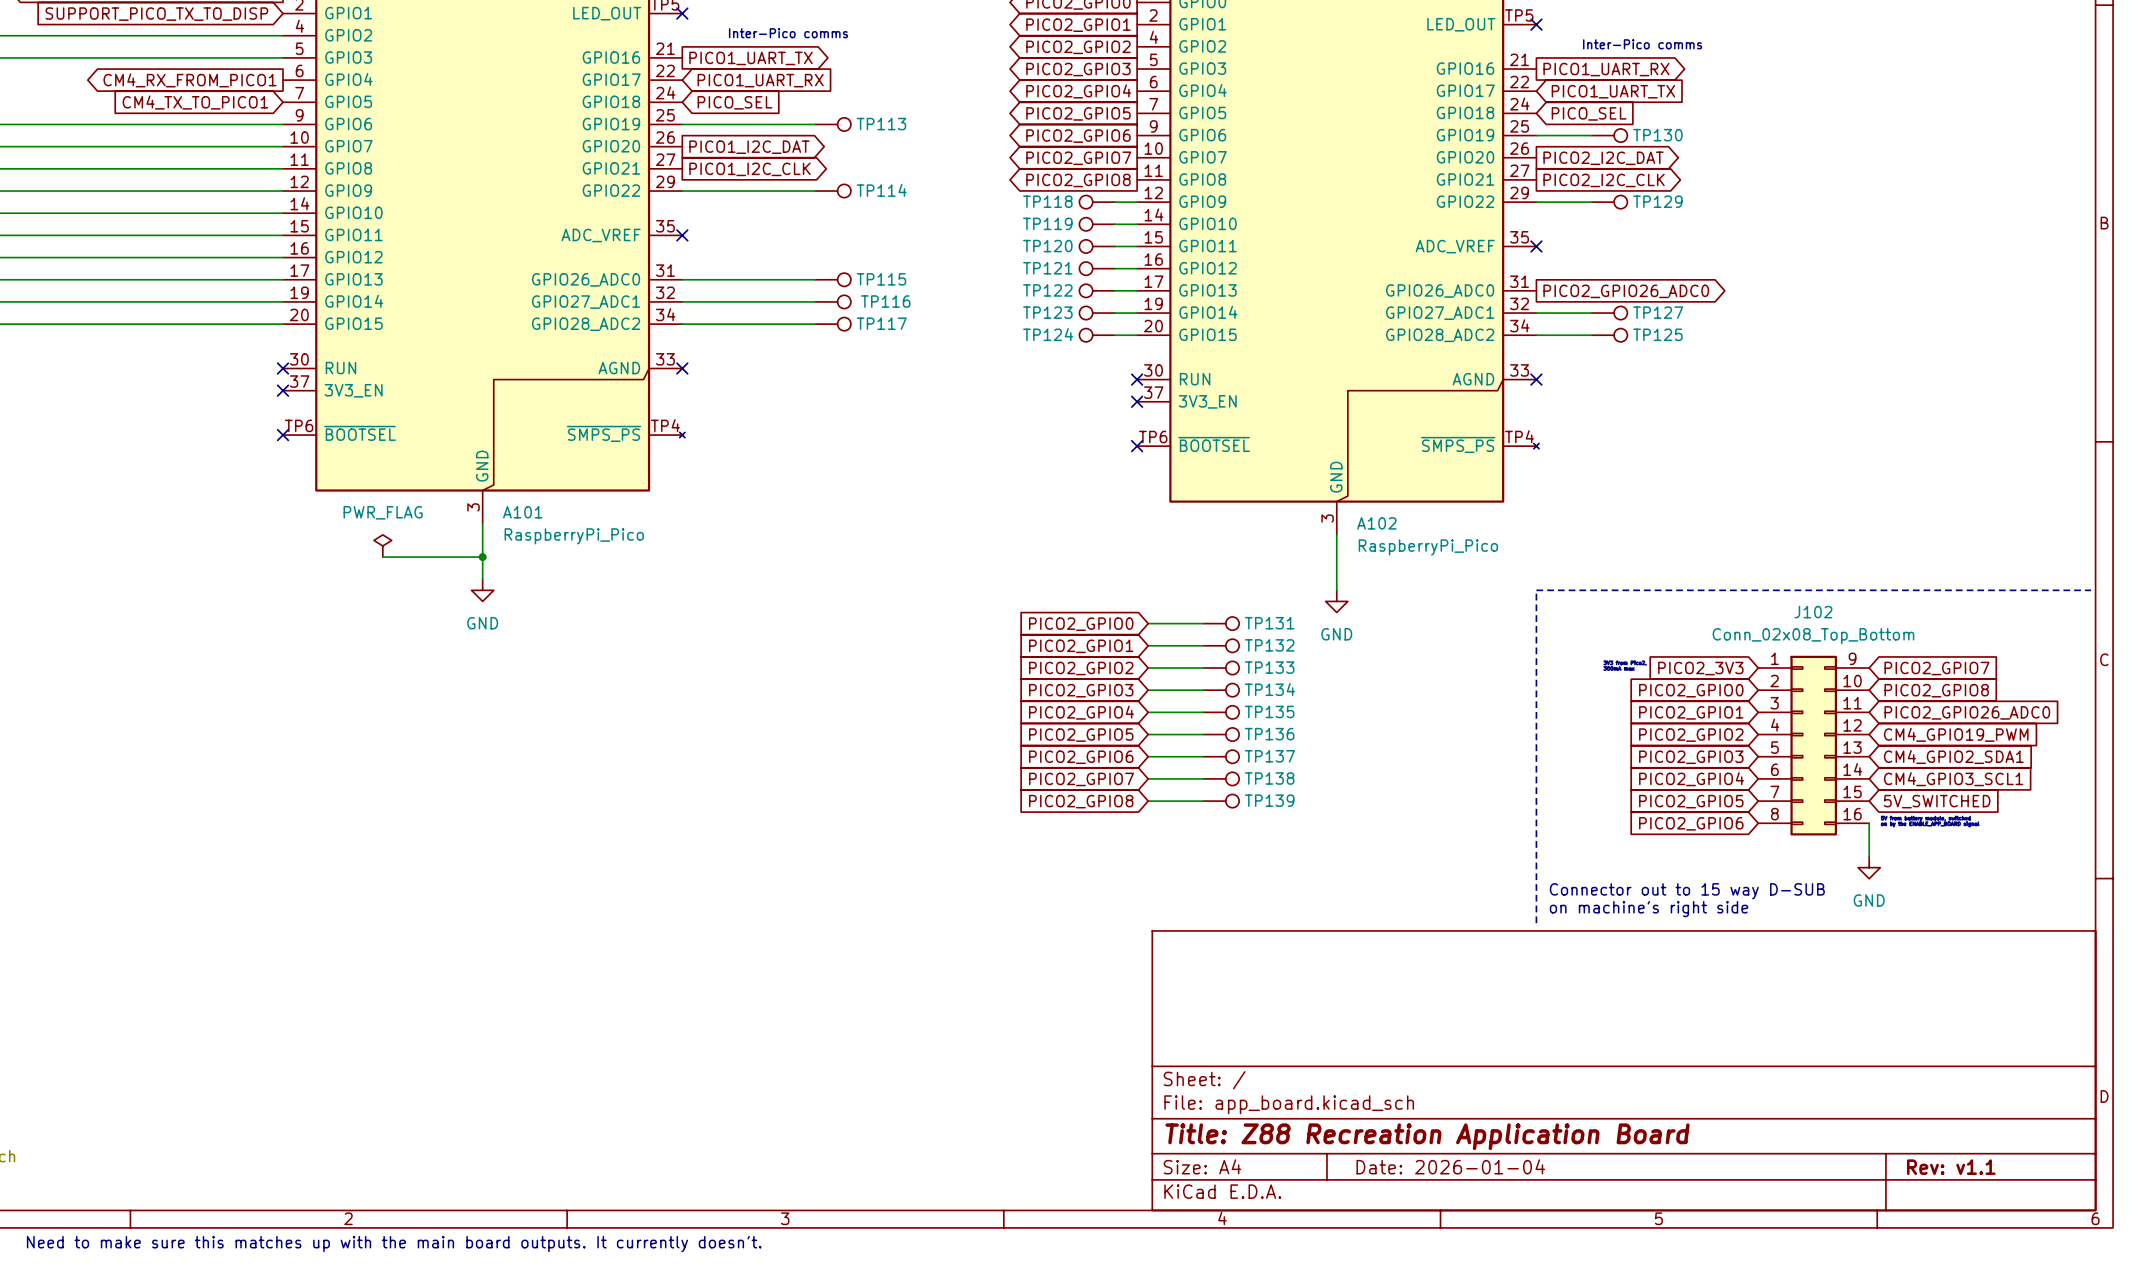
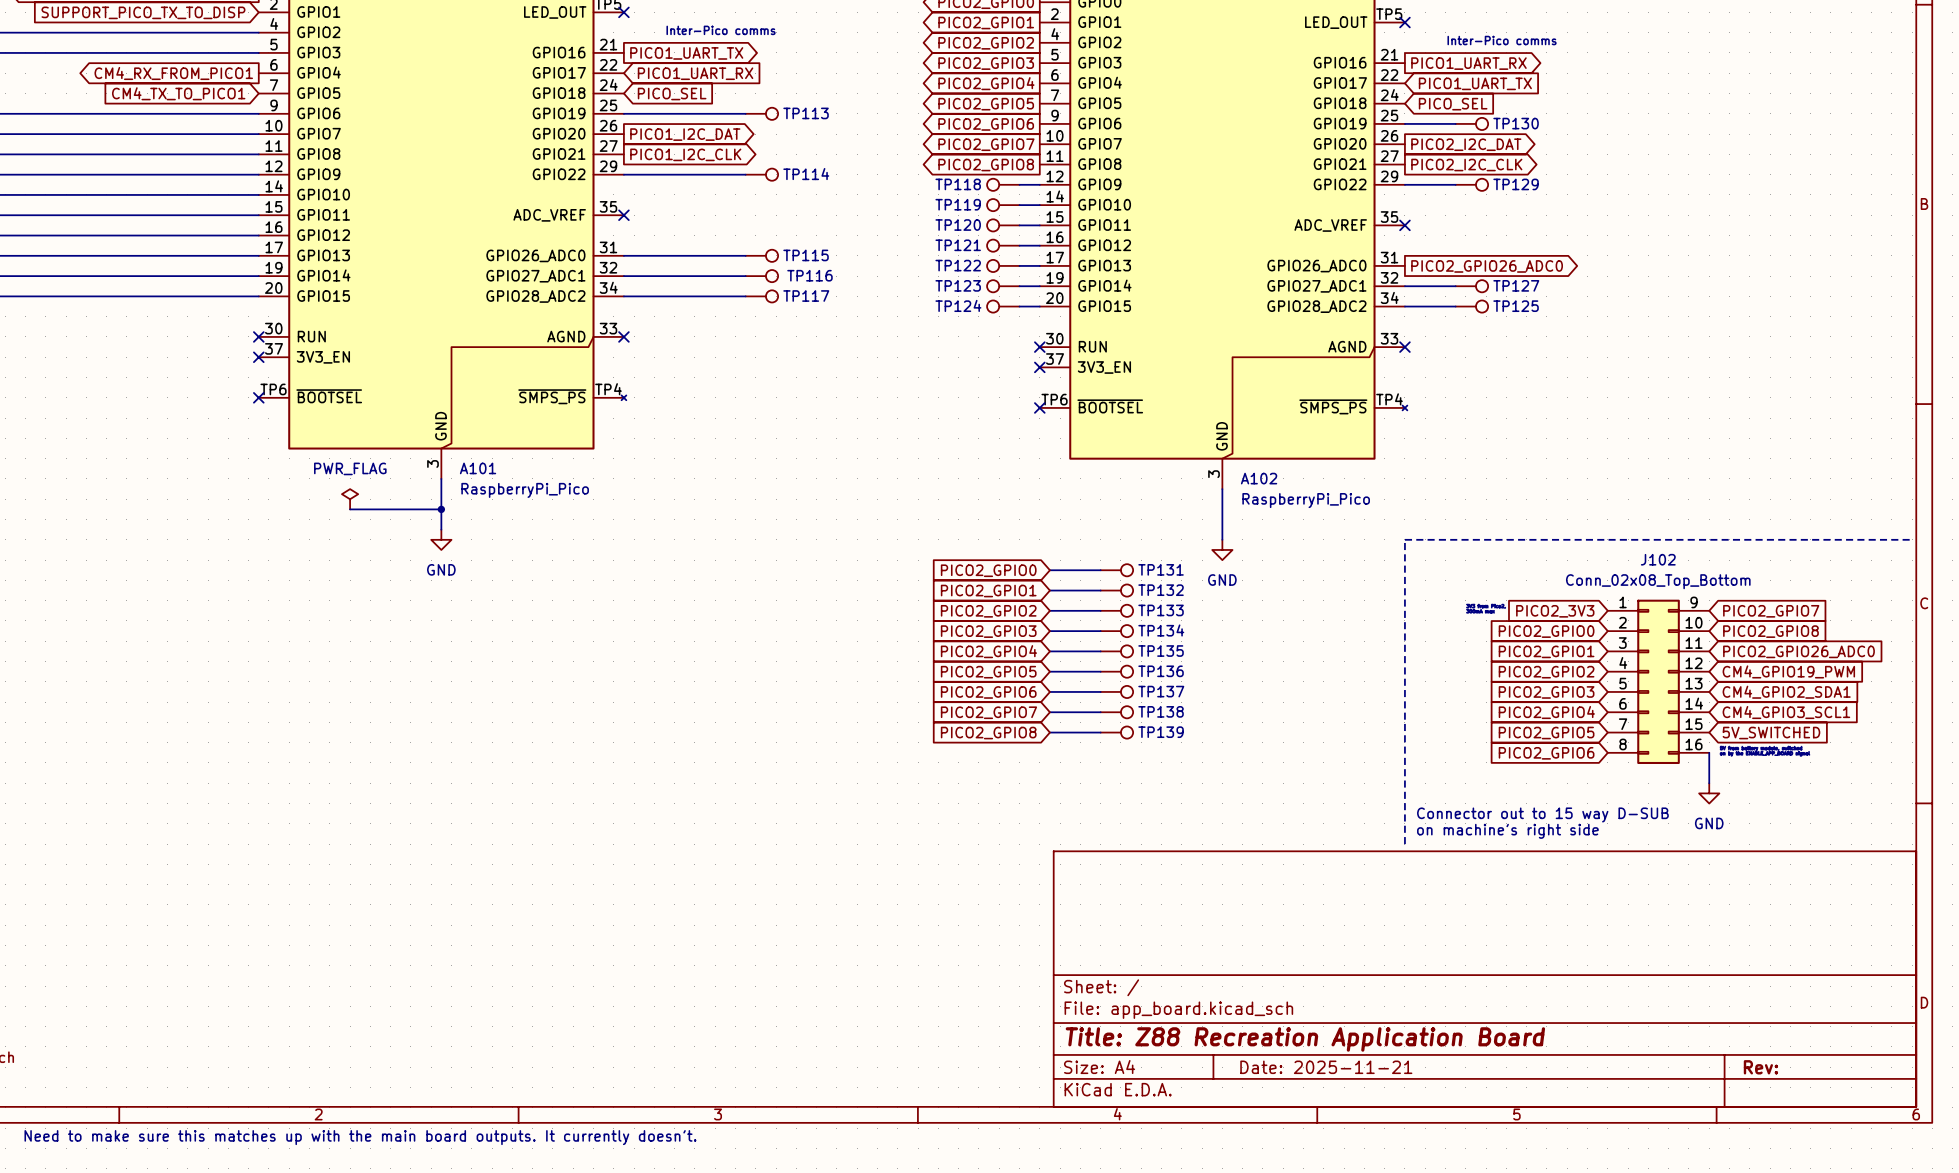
title block: Date: 2026-01-04 (1450, 1166) -> Date: 2025-11-21 (1326, 1067)
title block: Rev: v1.1 (1951, 1167) -> Rev: (1760, 1067)

